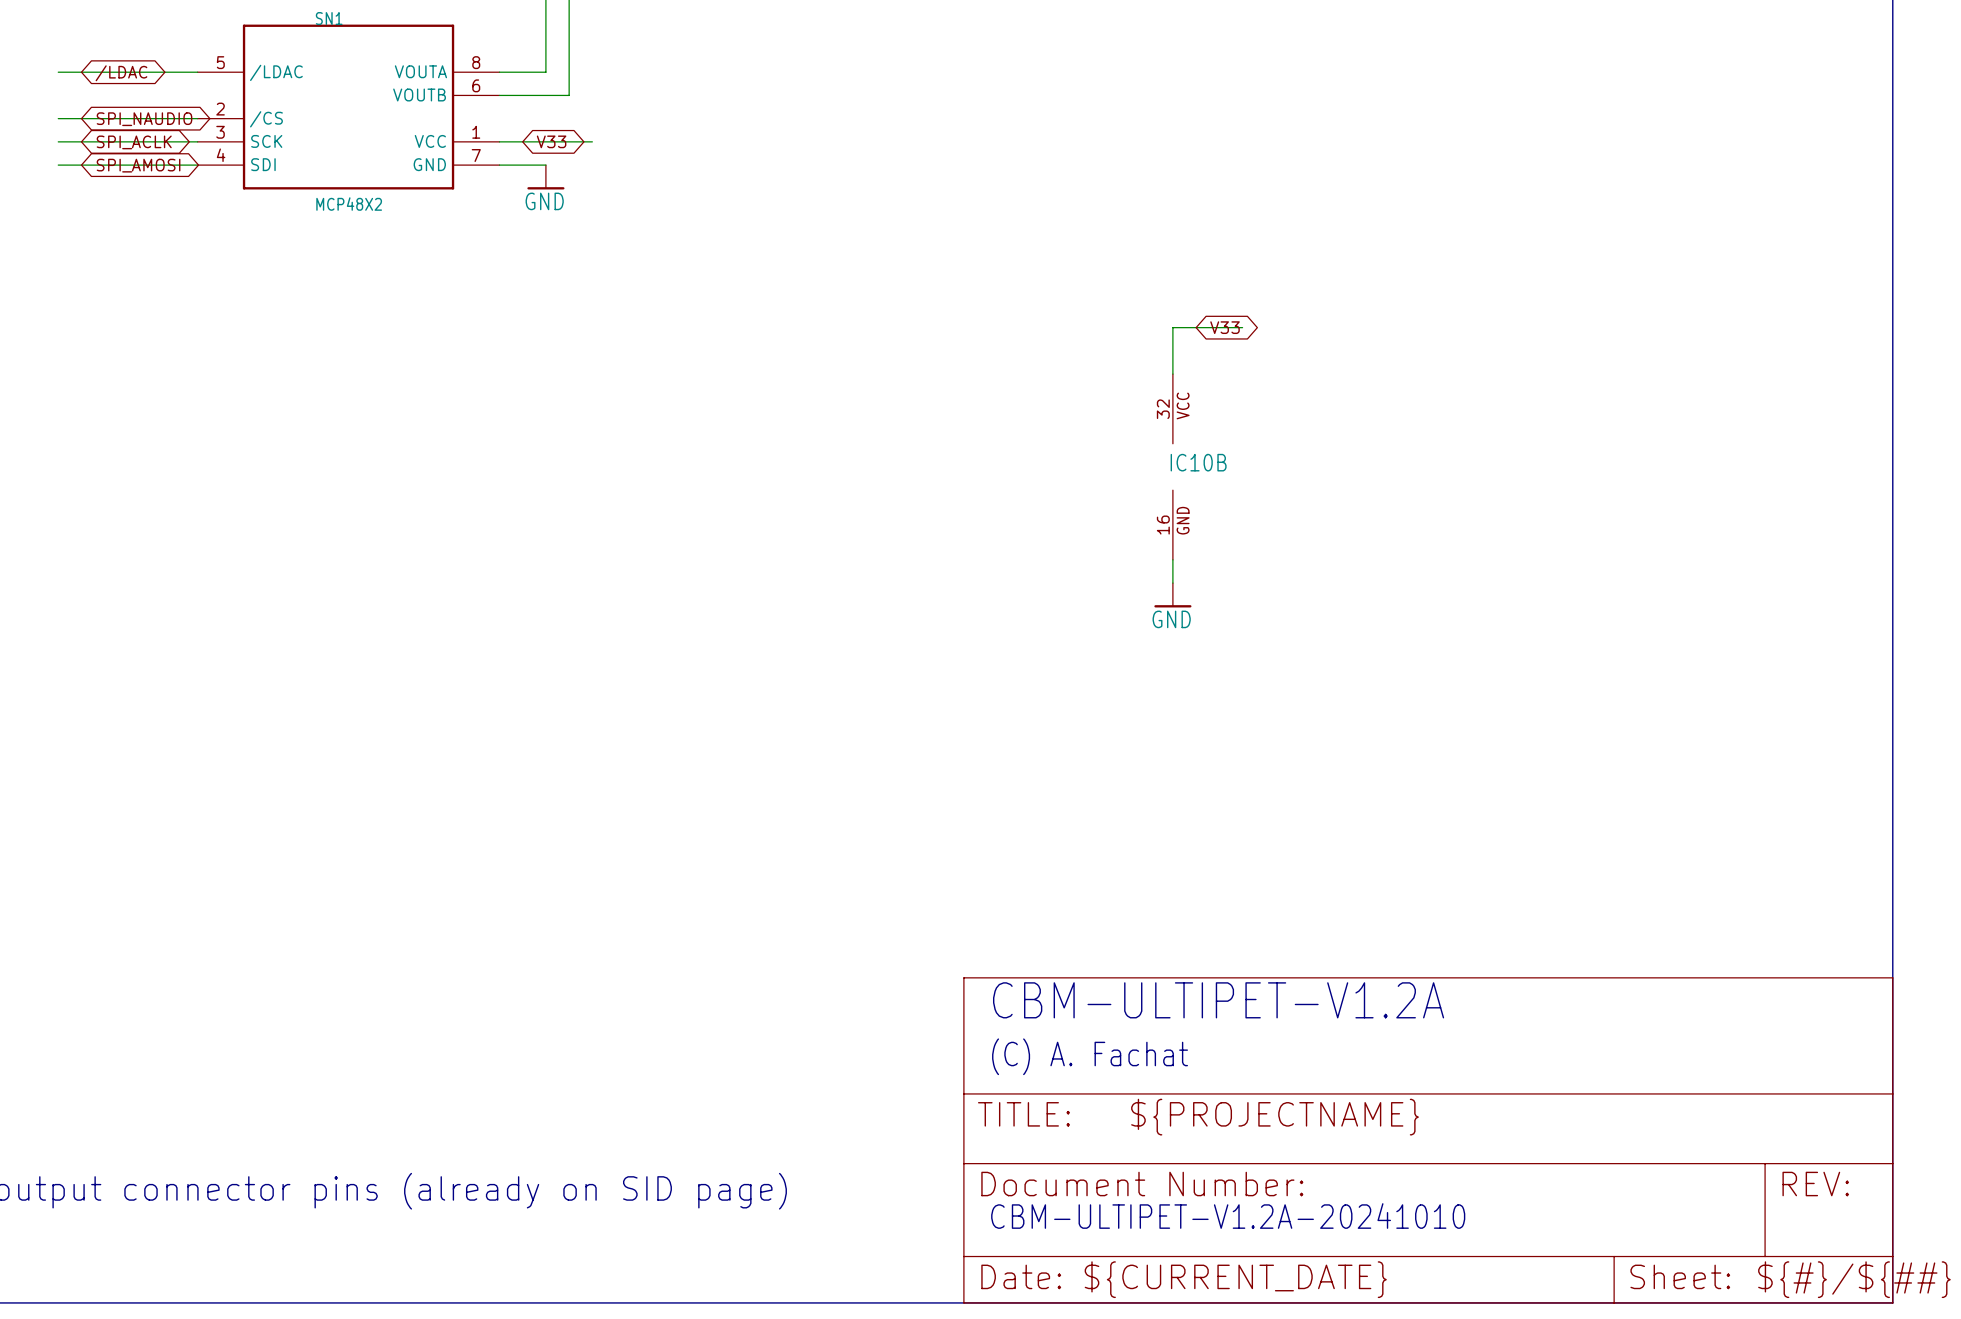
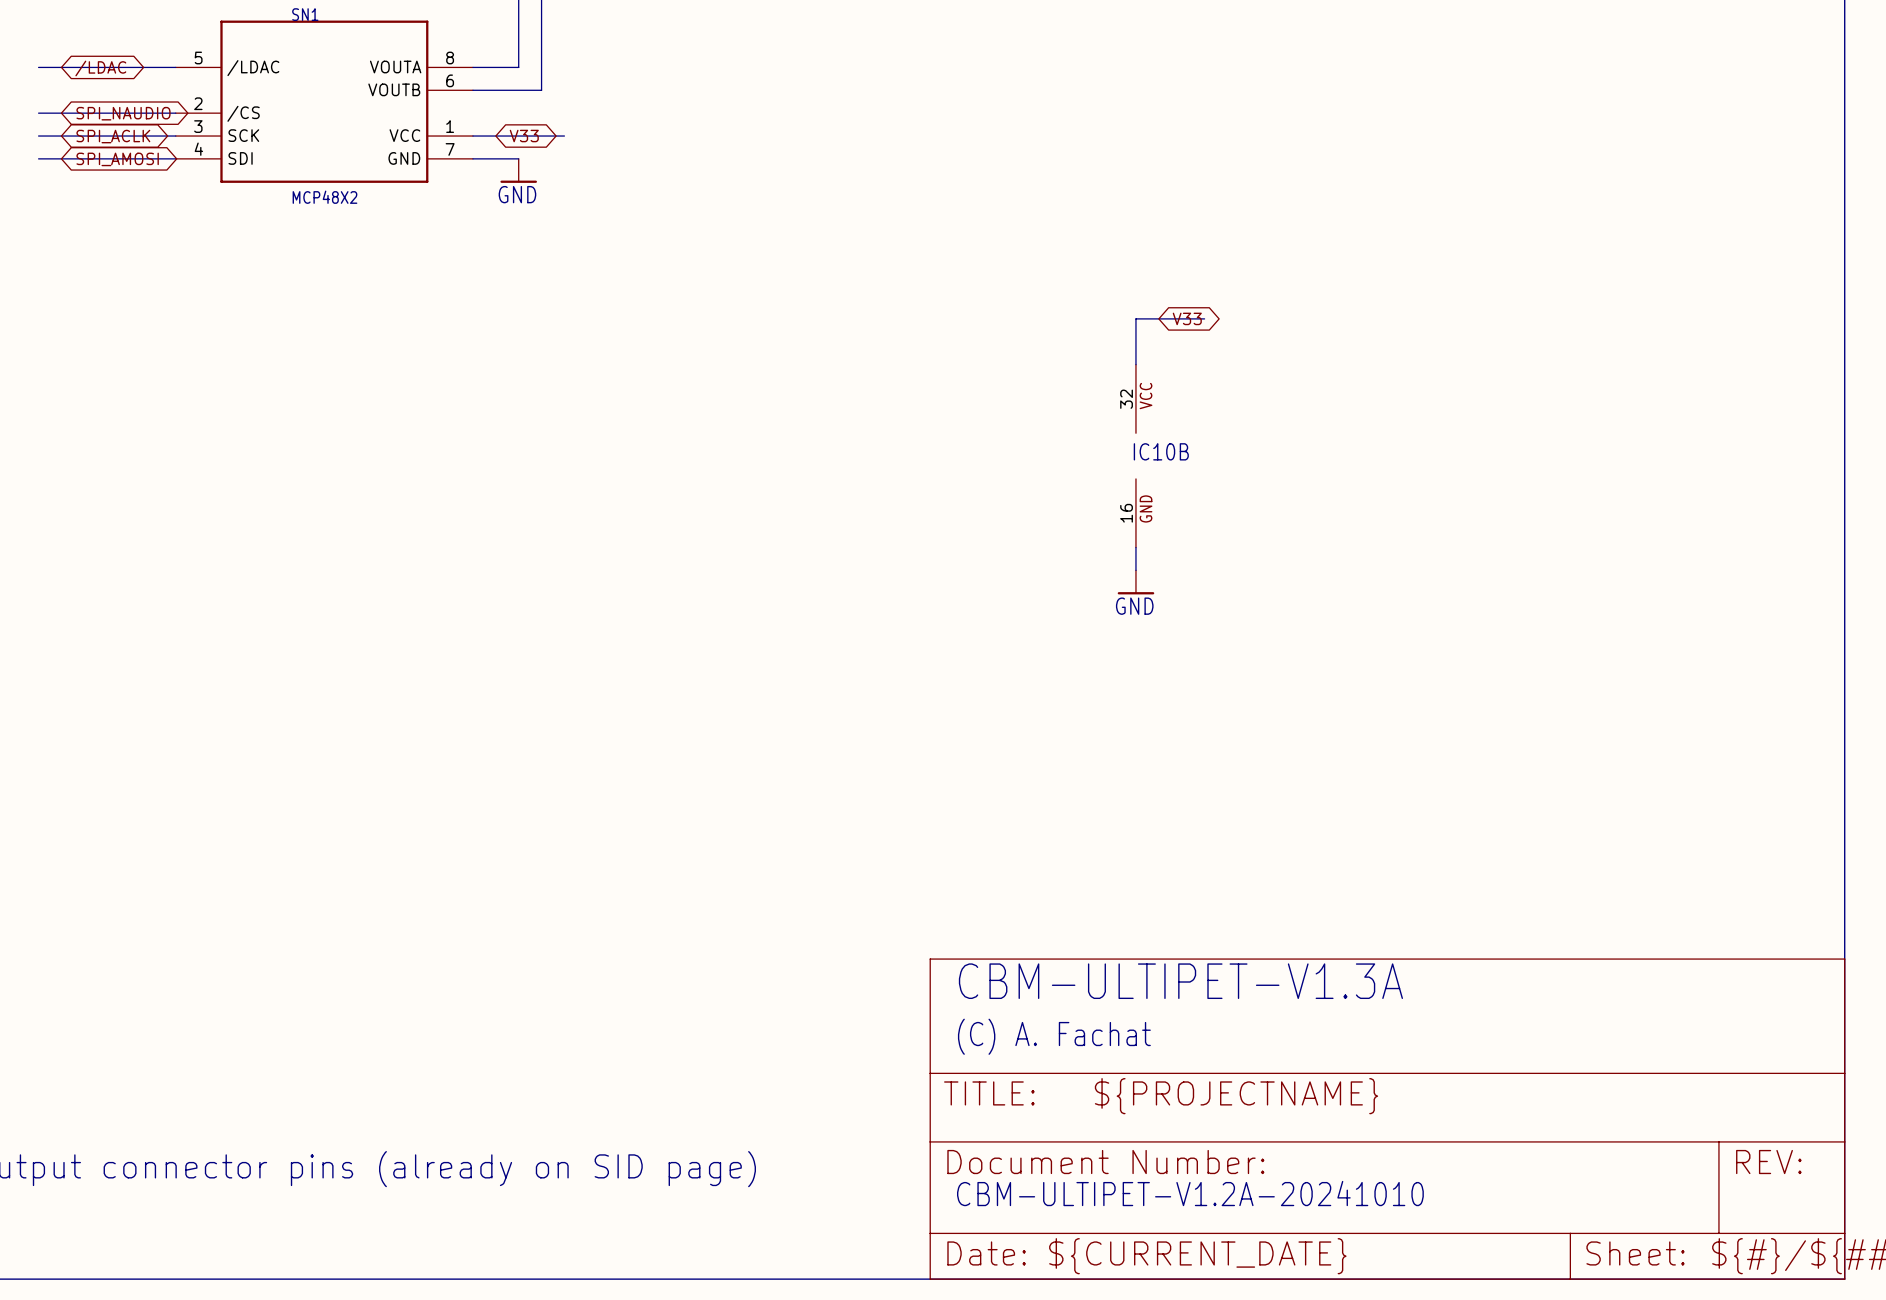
text: CBM-ULTIPET-V1.2A (1218, 1000) -> CBM-ULTIPET-V1.3A (1180, 981)

